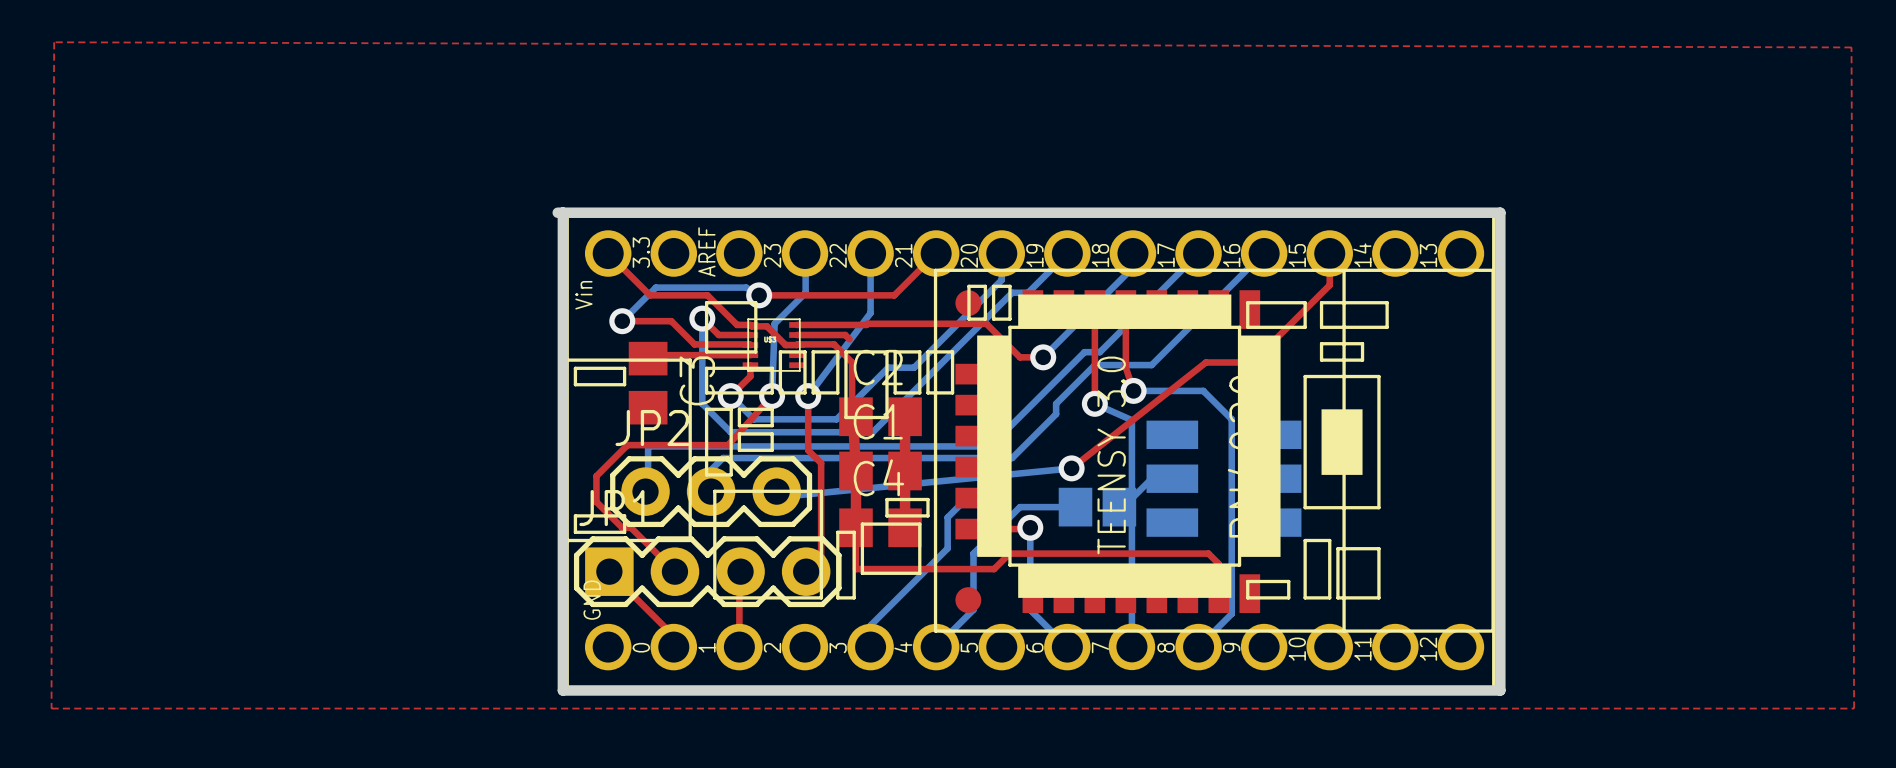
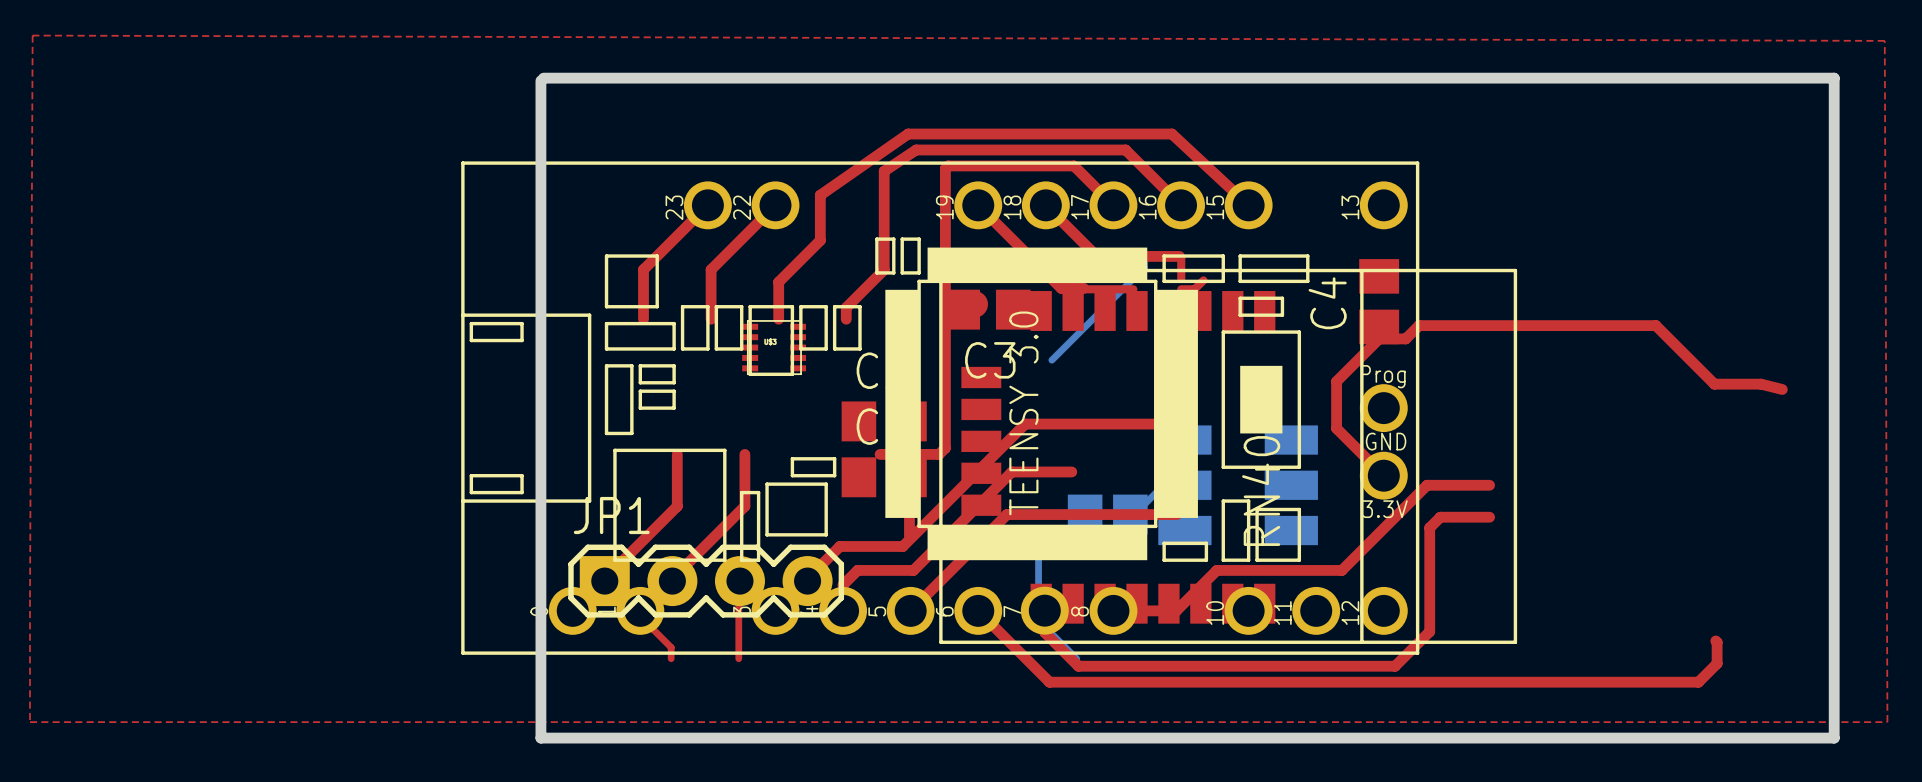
board edge: none -> (543, 78) (1834, 78) (1834, 738) (540, 738) (540, 80)
top track: none -> (707, 205) (643, 269) (643, 319)
top track: none -> (775, 205) (711, 269) (711, 319)
top track: none -> (978, 205) (1061, 288) (1133, 289)
top track: none -> (1045, 205) (1096, 256) (1179, 256) (1181, 258) (1181, 278)
top track: none -> (1113, 205) (1074, 165) (948, 165) (945, 168) (945, 448) (939, 454) (880, 454)
top track: none -> (1181, 205) (1125, 149) (916, 149) (884, 171) (884, 269) (846, 307) (846, 319)
top track: none -> (1248, 205) (1172, 134) (908, 134) (820, 195) (820, 240) (778, 282) (778, 319)
board edge: (557, 212) (1500, 212) (1500, 690) (562, 690) (562, 212) -> none
top track: (608, 253) (650, 295) (707, 295) (737, 324) (766, 326) (785, 345) (834, 344) (852, 362) (852, 416) -> none
bottom track: (804, 253) (805, 292) (774, 323) (772, 396) -> none
bottom track: (870, 253) (870, 313) (808, 396) -> none
top track: (936, 253) (894, 295) (759, 295) -> none
bottom track: (1001, 253) (1001, 280) (914, 367) (888, 367) (836, 419) (753, 419) (730, 396) -> none
bottom track: (1067, 253) (1028, 292) (1012, 292) (872, 432) (730, 432) (702, 403) (702, 318) -> none
bottom track: (1198, 253) (1099, 352) (1084, 352) (990, 446) (649, 446) (648, 489) (645, 491) -> none
bottom track: (1264, 253) (1151, 365) (1094, 365) (1056, 403) (1056, 414) (1012, 458) (723, 458) (710, 470) (711, 491) -> none
top track: (1329, 253) (1329, 285) (1252, 362) (1205, 362) (1071, 468) -> none
top track: none -> (1203, 280) (1194, 289) (1181, 289)
bottom track: (759, 295) (746, 287) (655, 287) (622, 321) -> none
via: (759, 295) -> none
top track: (1094, 309) (1094, 403) -> none
top track: (1125, 309) (1125, 367) (1133, 390) -> none
top track: (702, 318) (718, 335) (750, 335) -> none
via: (702, 318) -> none
top track: (622, 321) (671, 321) (694, 344) (750, 345) -> none
via: (622, 321) -> none
top track: (796, 324) (986, 323) (1019, 357) (1043, 357) -> none
top track: (796, 335) (845, 335) (849, 339) -> none
top track: (750, 355) (651, 355) (648, 358) -> none
via: (1043, 357) -> none
top track: (750, 365) (750, 376) (730, 396) -> none
C3 rotation: 0° (648, 383) -> 90° clockwise (987, 309)
C3 position: (648, 383) -> (987, 309)
top track: none -> (1782, 389) (1761, 384) (1714, 384) (1655, 325) (1419, 325) (1405, 338) (1379, 338) (1336, 381) (1336, 428) (1383, 475)
bottom track: (1133, 390) (1203, 390) (1231, 419) (1231, 613) (1198, 647) -> none
via: (1133, 390) -> none
via: (730, 396) -> none
top track: (772, 396) (728, 445) (627, 445) (596, 476) (596, 501) (622, 527) (631, 527) (674, 571) -> none
via: (772, 396) -> none
top track: (808, 396) (808, 450) (821, 463) (821, 556) (806, 571) -> none
via: (808, 396) -> none
part: none -> (940, 408)
bottom track: (1094, 403) (1131, 420) (1131, 646) -> none
via: (1094, 403) -> none
top track: (852, 416) (855, 470) (855, 569) (994, 569) (1009, 553) (1208, 553) (1218, 563) (1218, 593) -> none
top track: none -> (1176, 424) (1025, 424) (902, 546) (839, 546) (775, 610)
top track: none -> (677, 454) (677, 506) (572, 610)
top track: none -> (744, 454) (744, 506) (640, 610)
part: (1030, 450) -> none
top track: none -> (1071, 471) (1011, 471) (913, 570) (857, 570) (843, 584) (843, 610)
bottom track: (1071, 468) (781, 496) (776, 491) -> none
via: (1071, 468) -> none
C4 name position: C4 (878, 477) -> C4 (1327, 303)
top track: none -> (1489, 485) (1427, 485) (1341, 570) (1216, 570) (1176, 610) (1113, 610)
JP2: (711, 491) -> none
bottom track: (973, 491) (947, 517) (947, 548) (870, 625) (870, 647) -> none
bottom track: (1075, 507) (1019, 507) (973, 553) (973, 609) (936, 647) -> none
top track: none -> (1176, 514) (1007, 514) (910, 610)
top track: none -> (1489, 517) (1440, 517) (1429, 527) (1429, 631) (1395, 666) (1078, 666) (1044, 632) (1044, 610)
C4 rotation: 0° (880, 527) -> 90° clockwise (1379, 301)
C4 position: (880, 527) -> (1379, 301)
via: (1030, 527) -> none
top track: none -> (978, 610) (1049, 682) (1698, 682) (1717, 663) (1715, 640)

